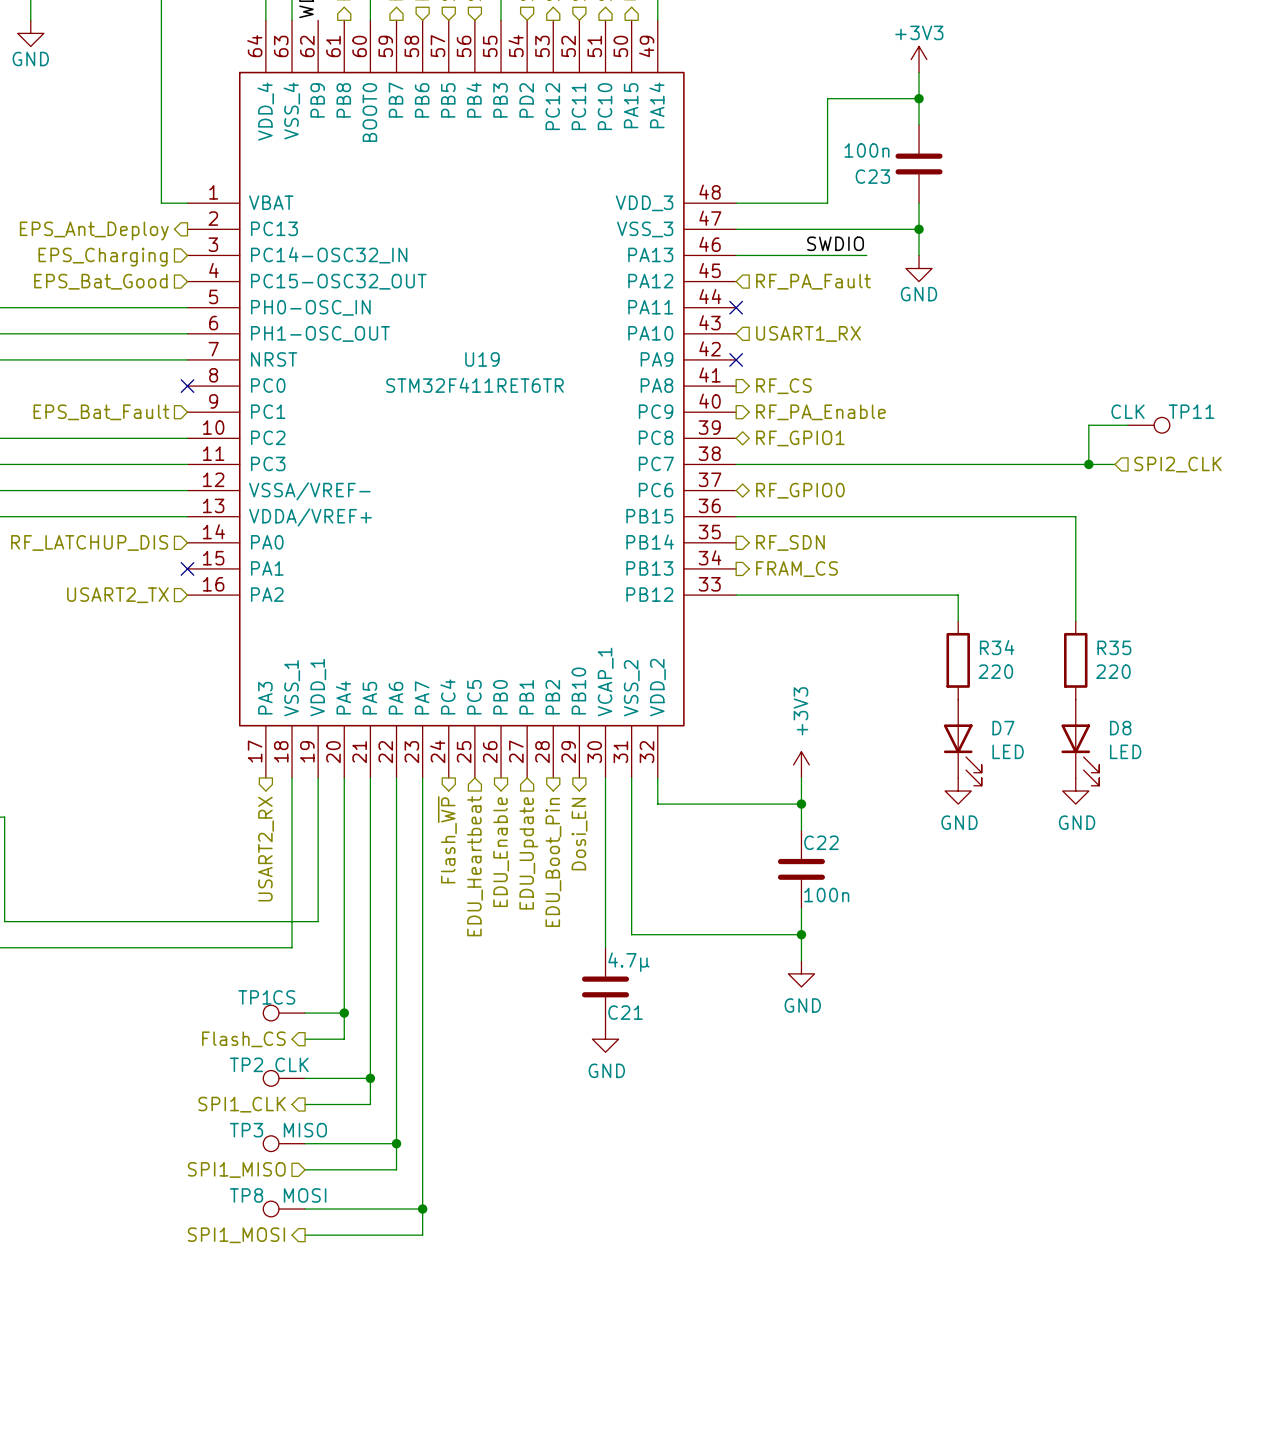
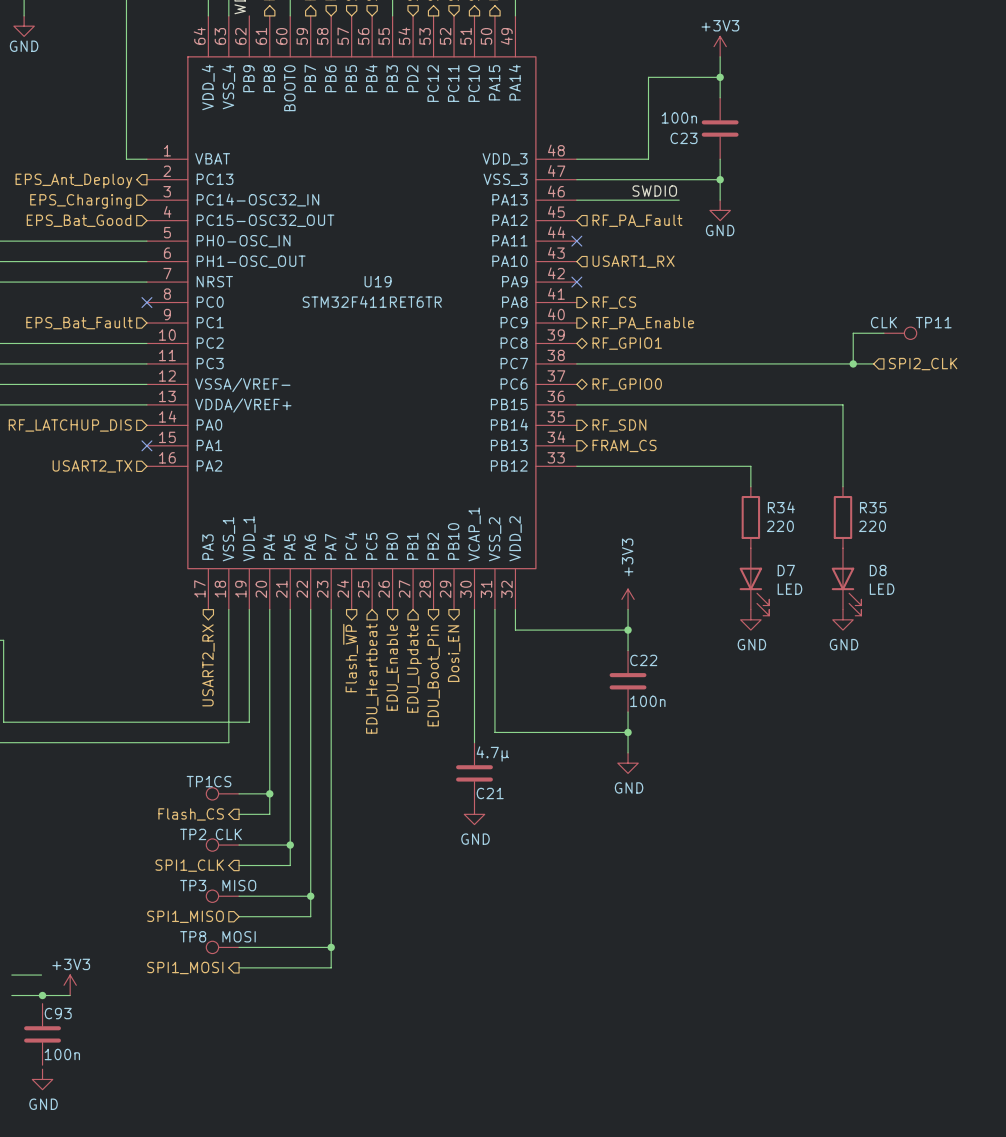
wire: none -> (11, 975) (41, 975)
power symbol: none -> +3V3 (70, 985)
wire: none -> (11, 995) (70, 995)
junction: none -> (42, 995)
C93: none -> 100n (42, 1034)
power symbol: none -> GND (42, 1079)

